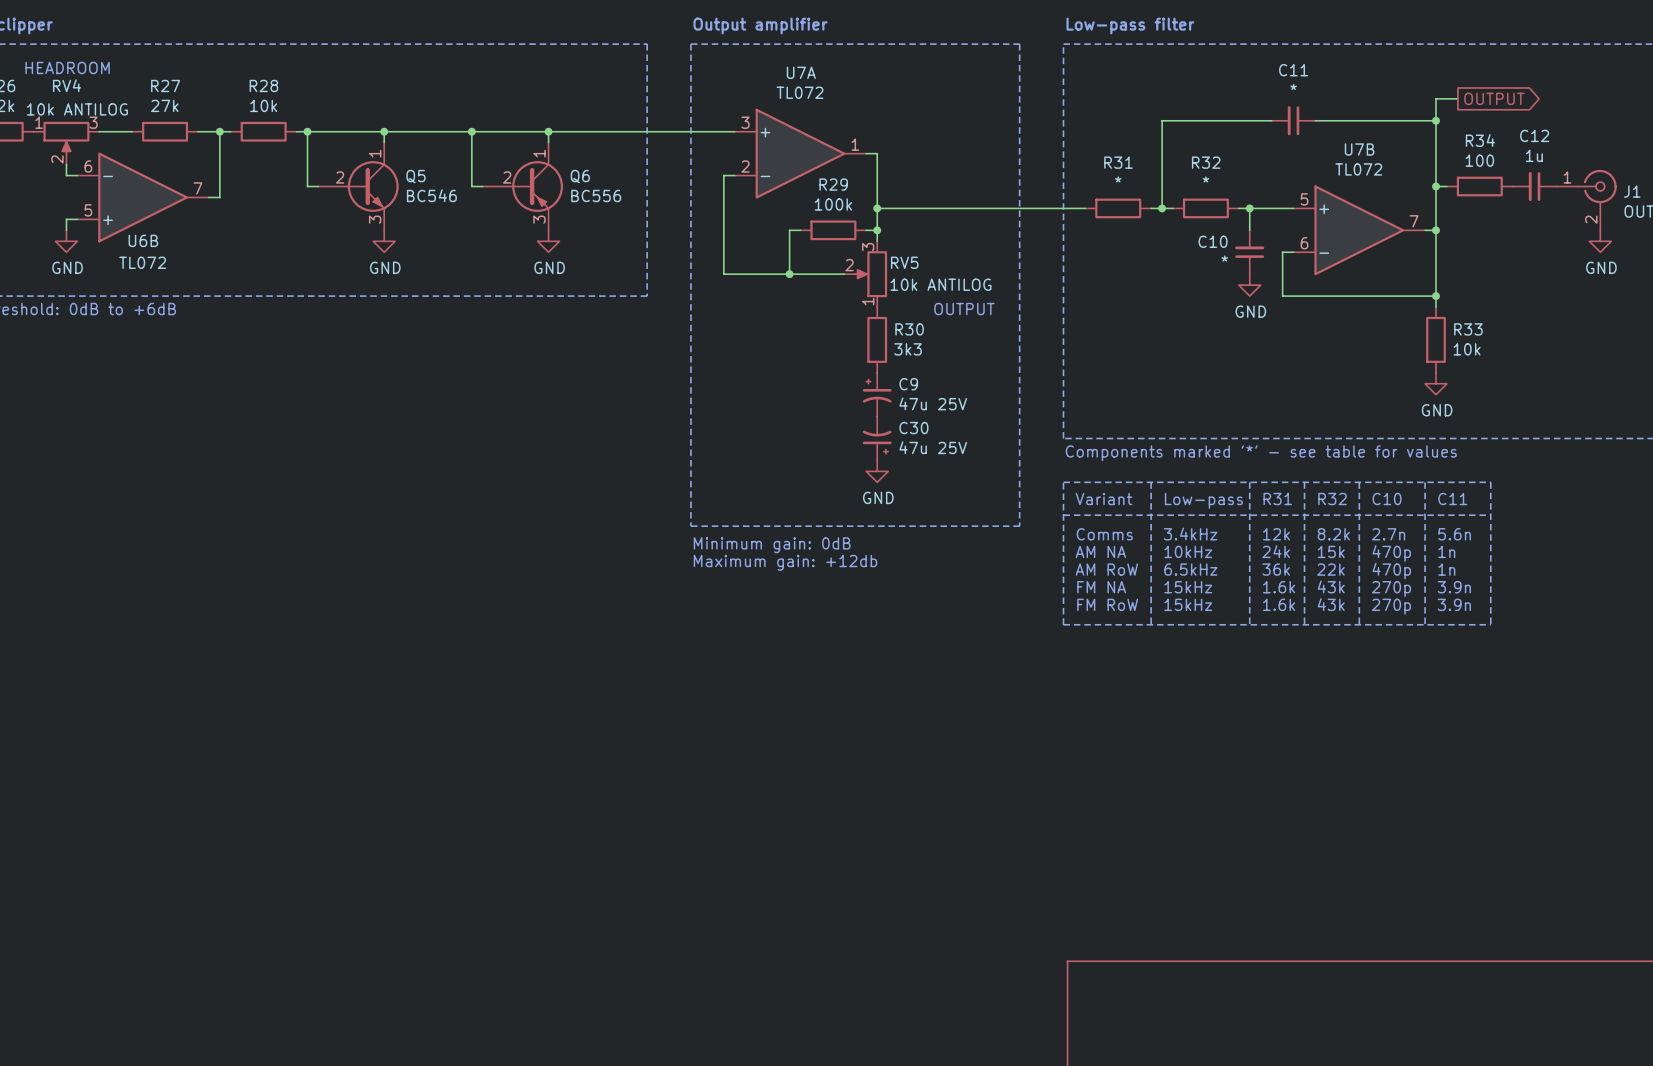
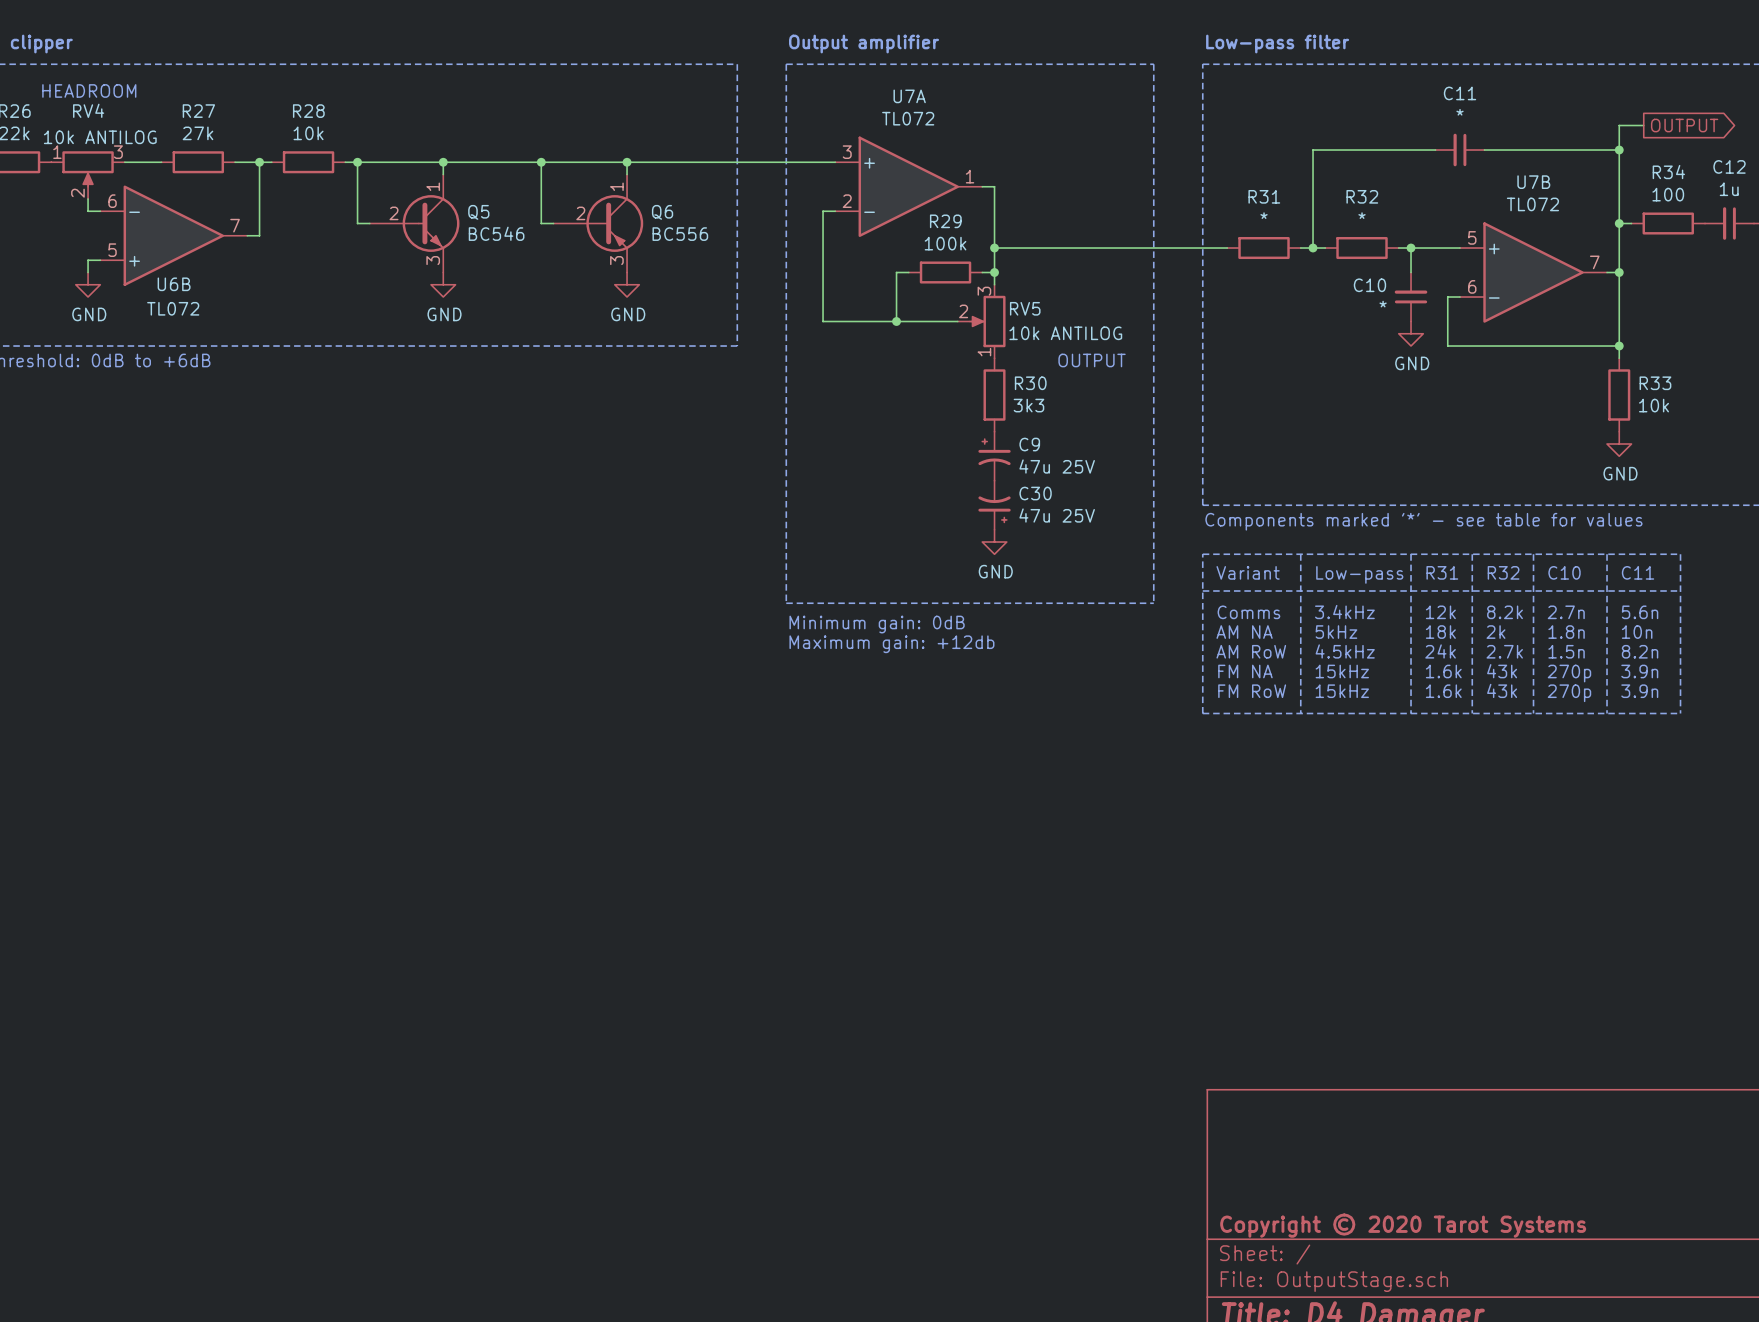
text: 10kHz (1188, 551) -> 5kHz (1336, 632)
text: 24k (1276, 551) -> 18k (1440, 632)
text: 15k (1331, 551) -> 2k (1495, 632)
text: 1n (1446, 551) -> 10n (1637, 632)
text: 470p (1391, 553) -> 1.8n (1566, 632)
text: 6.5kHz (1190, 569) -> 4.5kHz (1345, 651)
text: 36k (1276, 569) -> 24k (1440, 651)
text: 22k (1330, 569) -> 2.7k (1504, 651)
text: 1n (1446, 569) -> 8.2n (1640, 651)
text: 470p (1391, 571) -> 1.5n (1566, 651)

